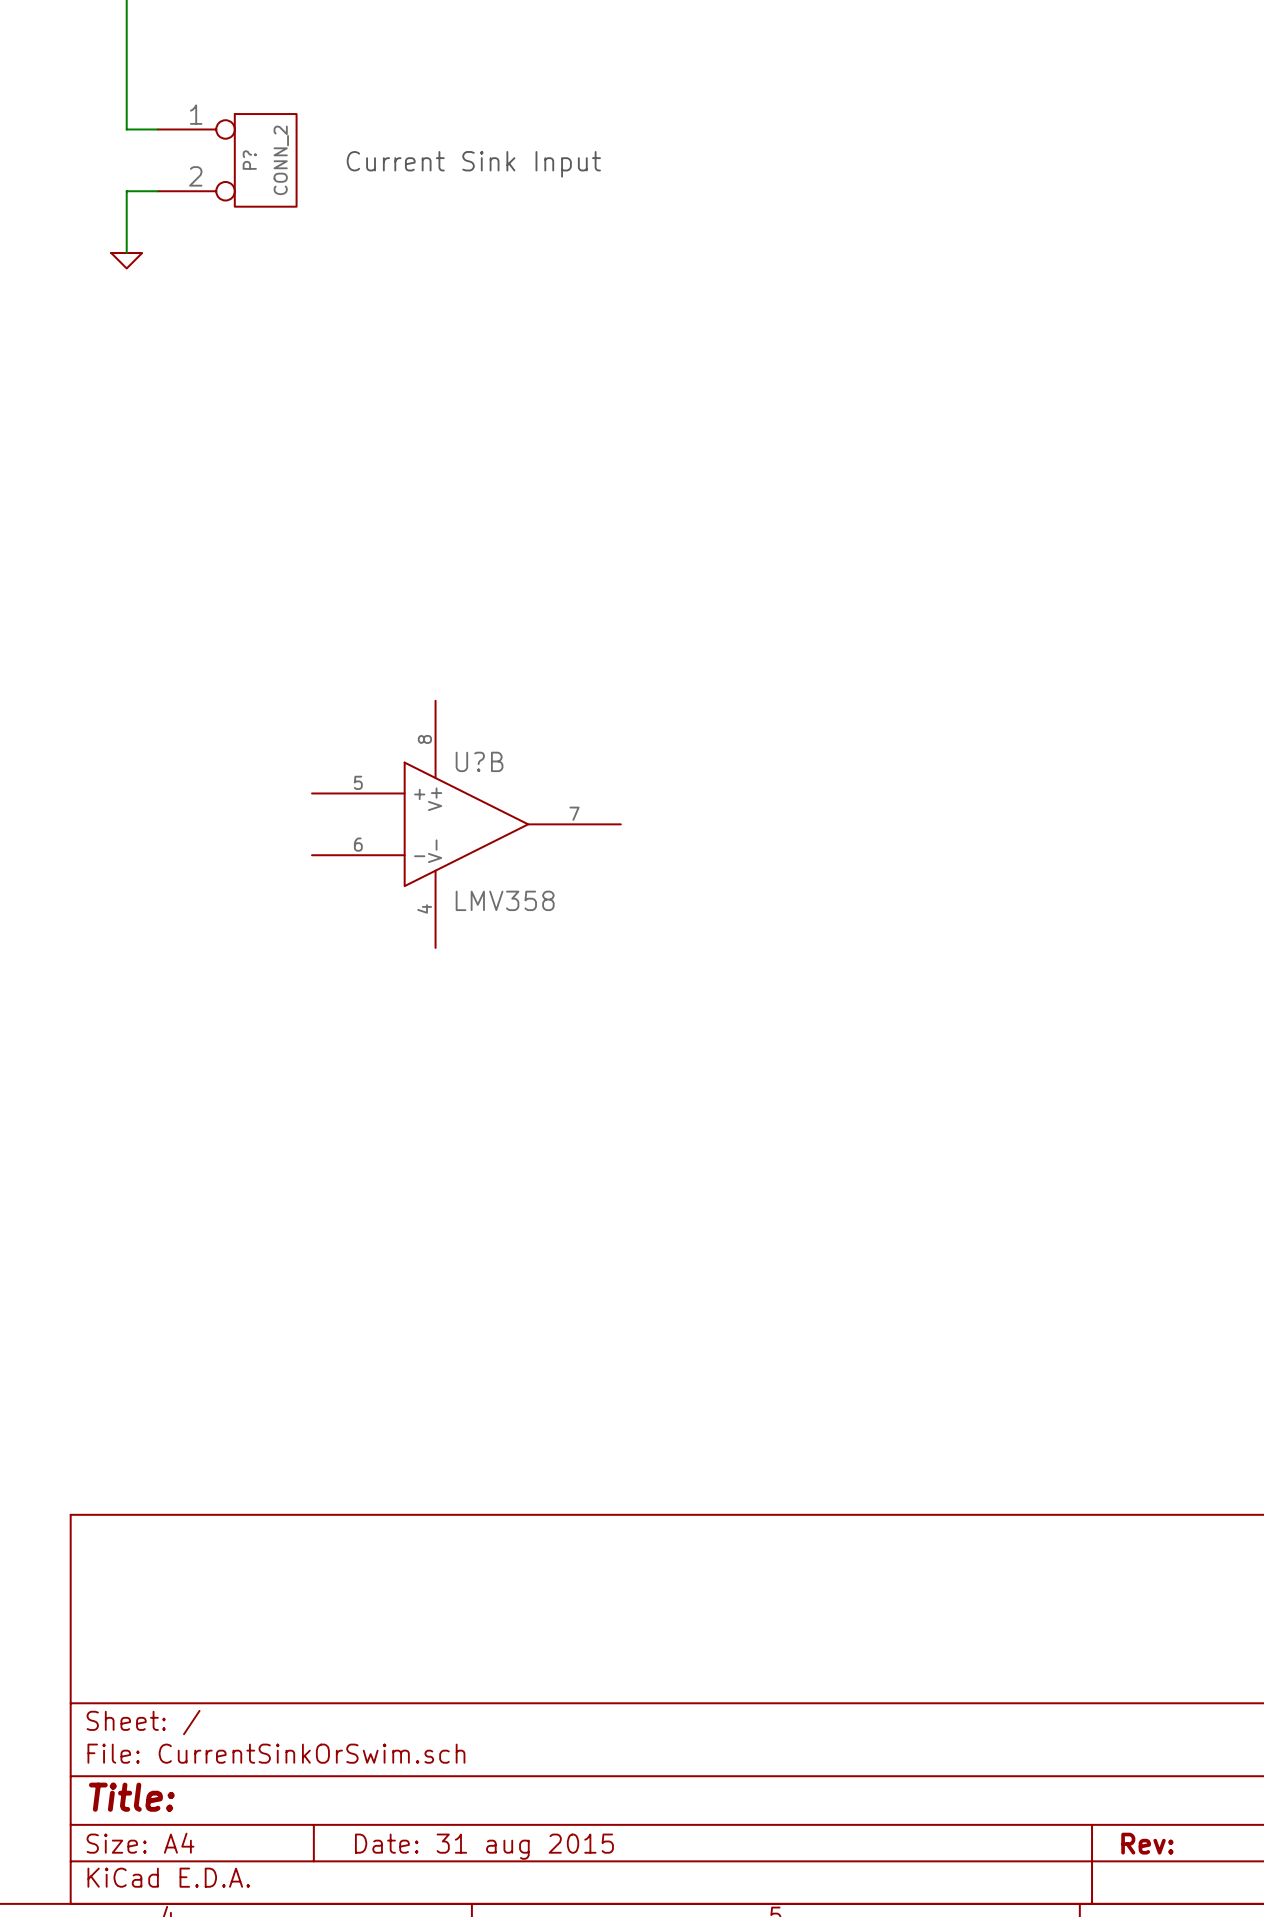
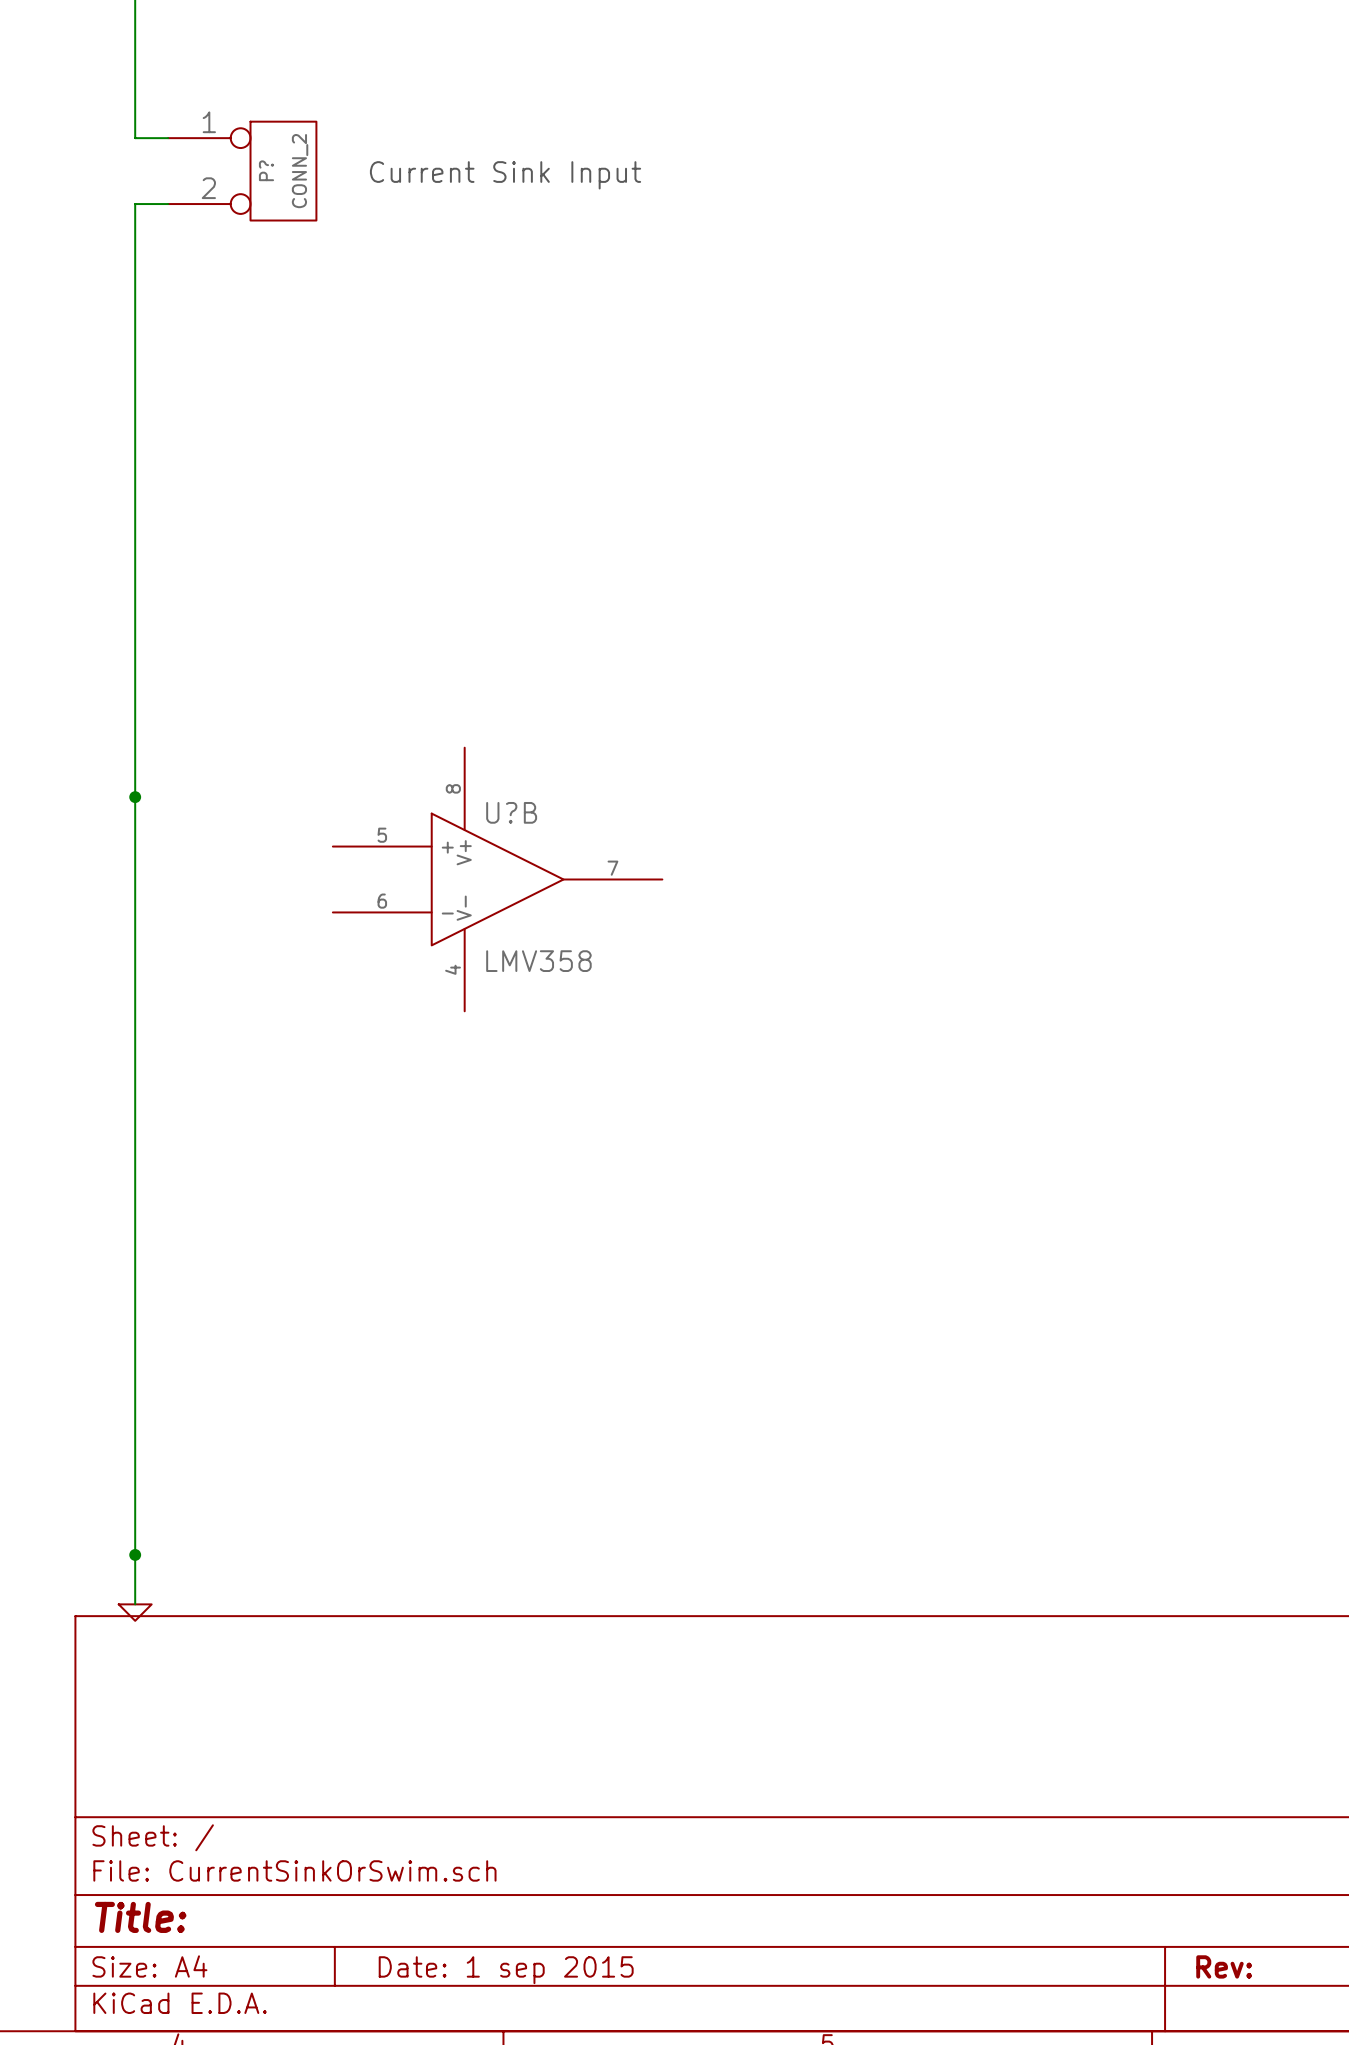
wire: none -> (135, 269) (135, 1604)
power symbol: (126, 260) -> none
junction: none -> (135, 797)
junction: none -> (135, 1554)
power symbol: none -> (135, 1612)
title block: Date: 31 aug 2015 (484, 1846) -> Date: 1 sep 2015 (506, 1970)

